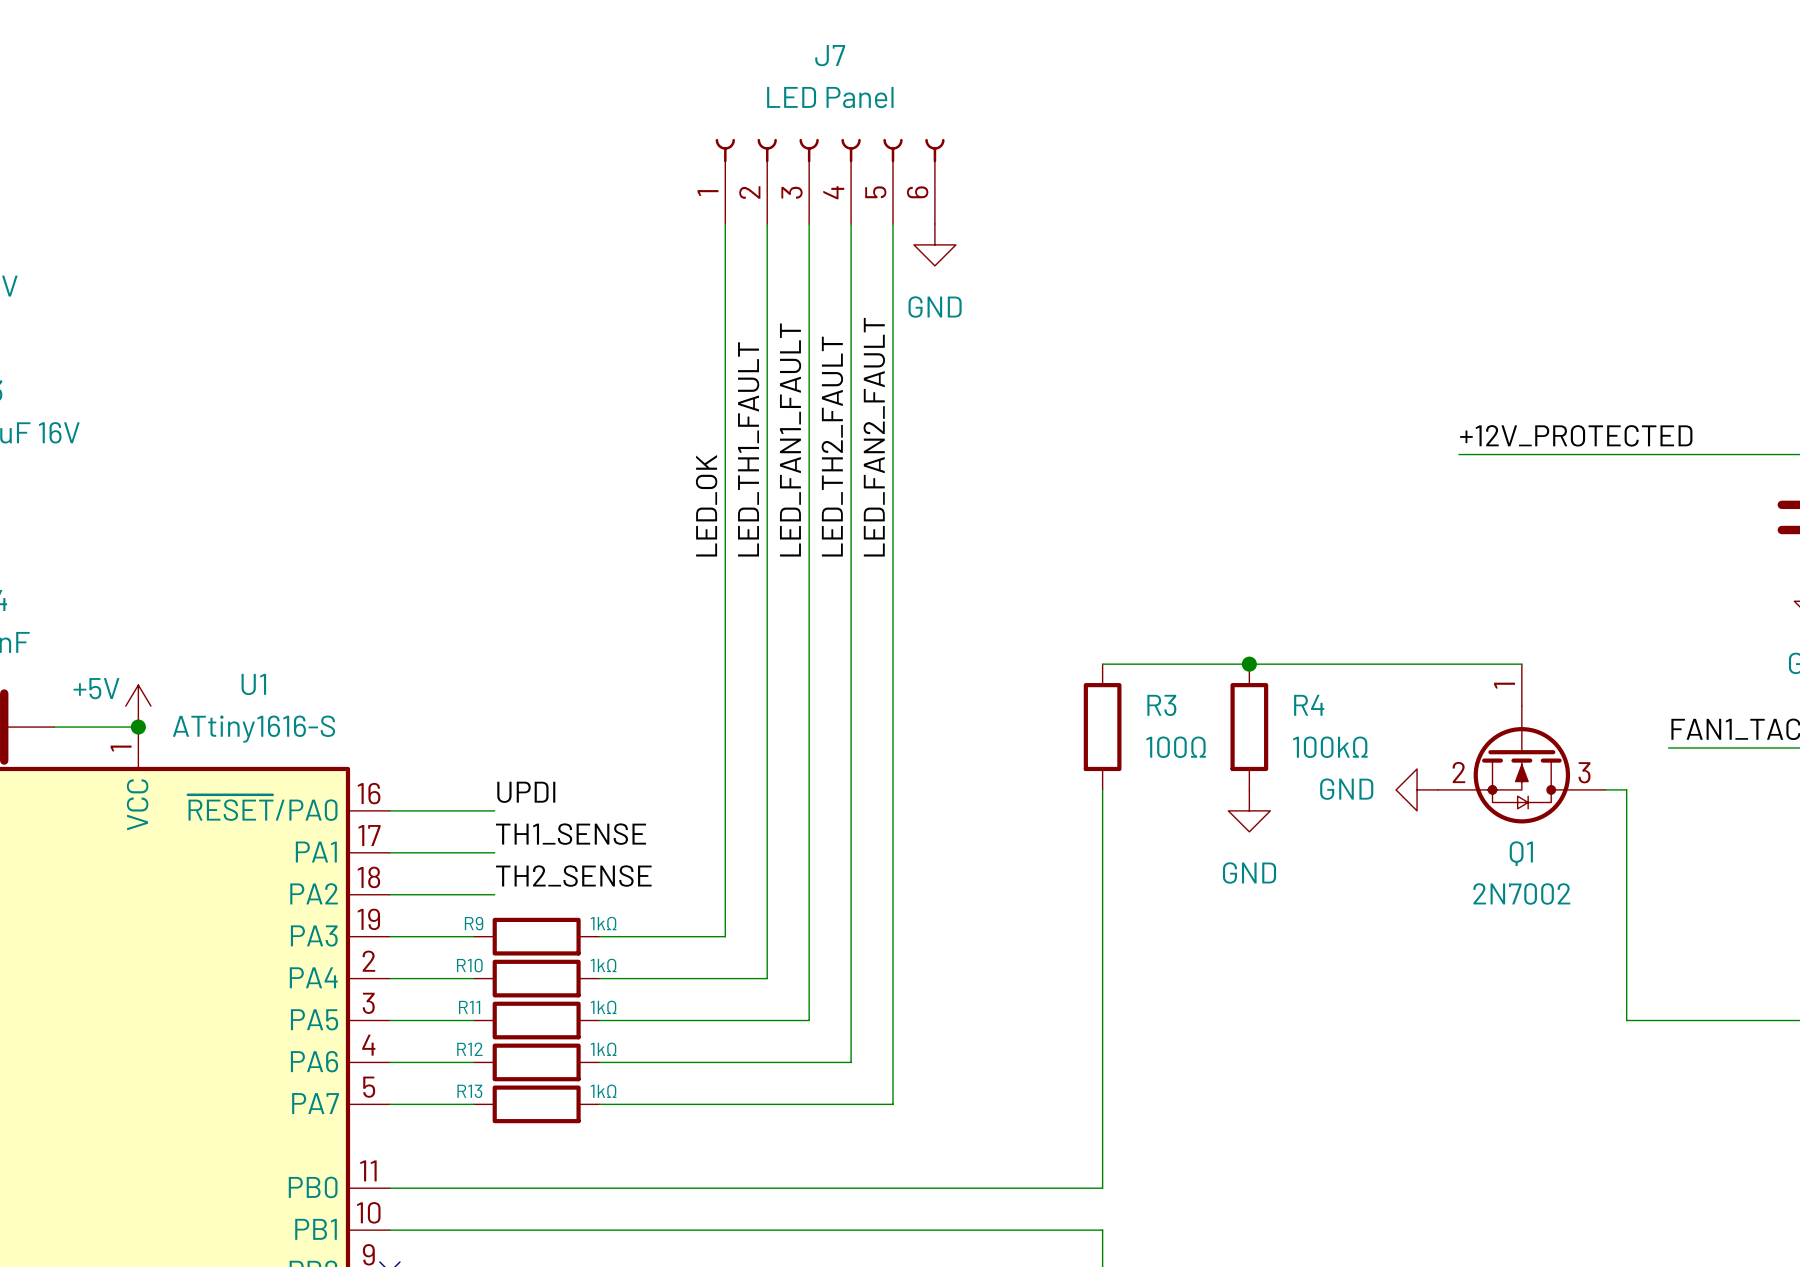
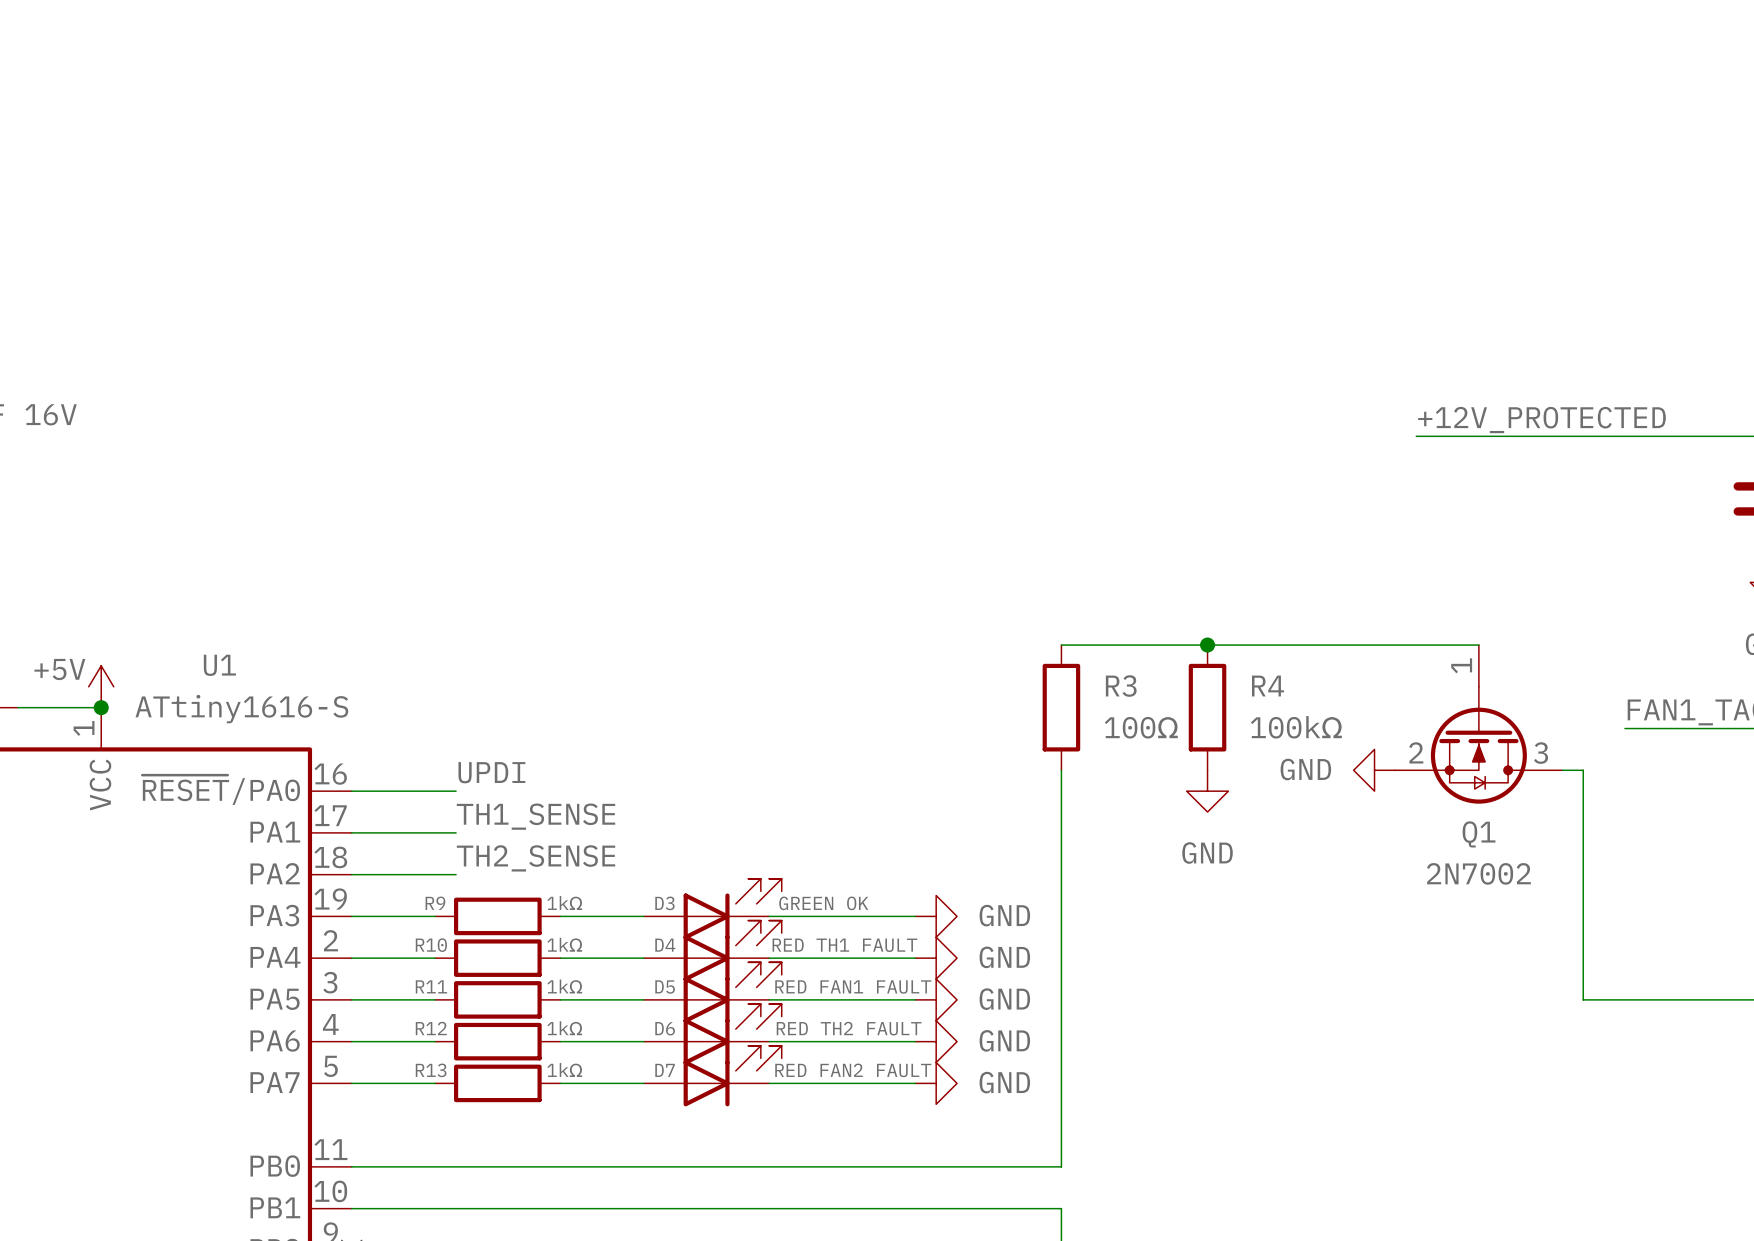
J7: LED Panel (830, 181) -> none
wire: (725, 223) (725, 936) (683, 936) -> none
wire: (767, 223) (767, 978) (683, 978) -> none
wire: (809, 223) (809, 1020) (683, 1020) -> none
wire: (851, 223) (851, 1062) -> (915, 1041) (810, 1041)
wire: (893, 223) (893, 1104) -> (915, 1083) (852, 1083)
power symbol: GND (934, 244) -> none
label: LED_FAN2_FAULT (874, 437) -> none
label: LED_FAN1_FAULT (790, 440) -> none
label: LED_TH2_FAULT (832, 446) -> none
label: LED_TH1_FAULT (748, 449) -> none
label: LED_OK (706, 505) -> none
D3: none -> GREEN OK (712, 909)
wire: none -> (769, 916) (915, 916)
power symbol: none -> GND (936, 916)
D4: none -> RED TH1 FAULT (712, 950)
wire: none -> (769, 958) (915, 958)
power symbol: none -> GND (936, 958)
D5: none -> RED FAN1 FAULT (712, 992)
wire: none -> (769, 999) (915, 999)
power symbol: none -> GND (936, 999)
D6: none -> RED TH2 FAULT (712, 1034)
power symbol: none -> GND (936, 1041)
D7: none -> RED FAN2 FAULT (712, 1076)
power symbol: none -> GND (936, 1083)

